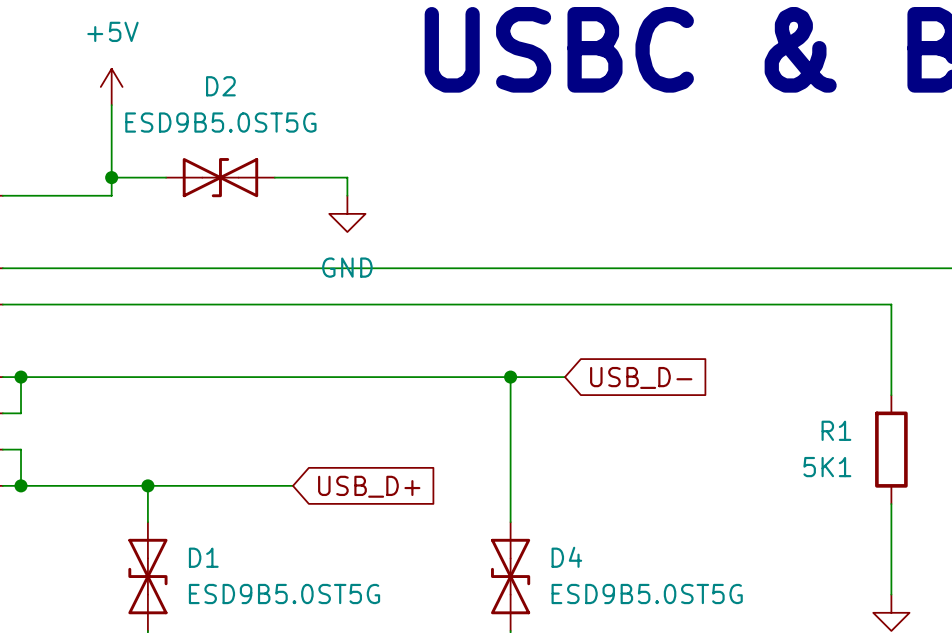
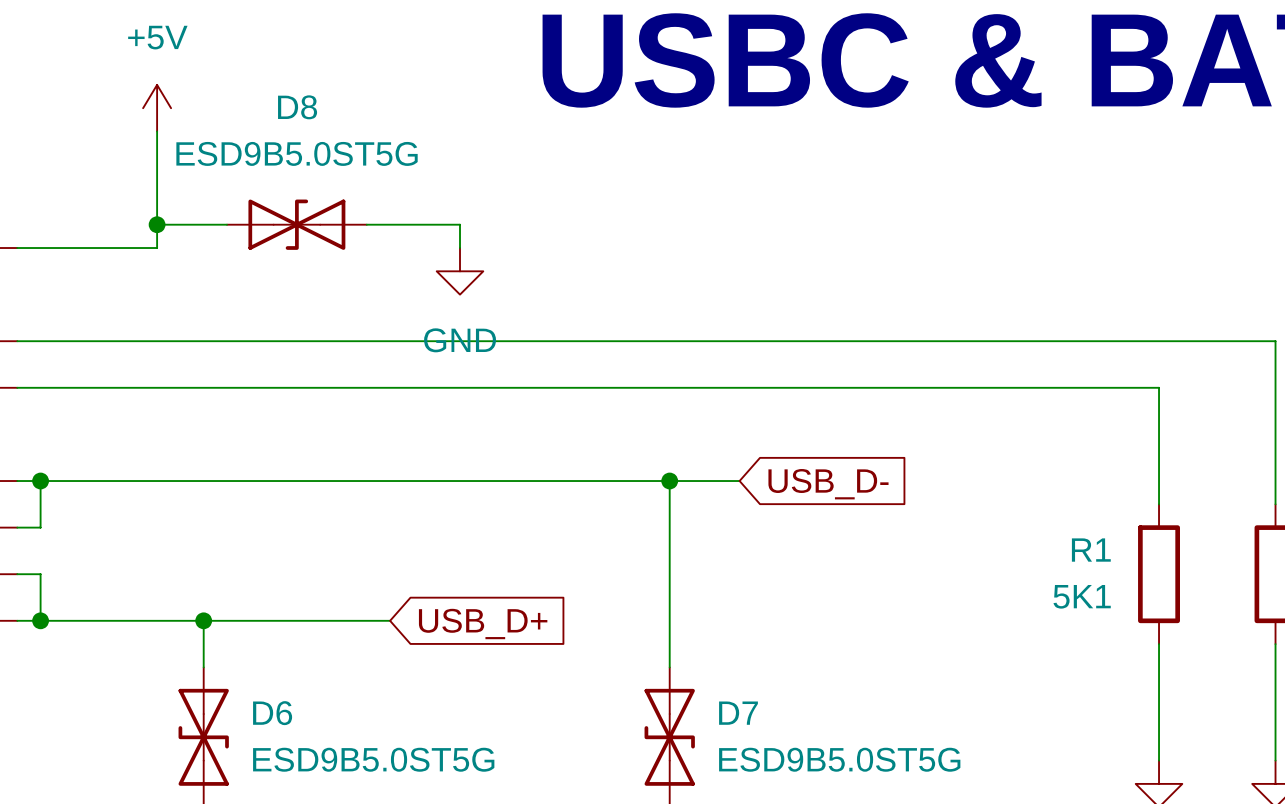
D2 name: D2 (220, 86) -> D8 (297, 107)
D1 name: D1 (203, 557) -> D6 (272, 713)
D4 name: D4 (566, 557) -> D7 (738, 713)

